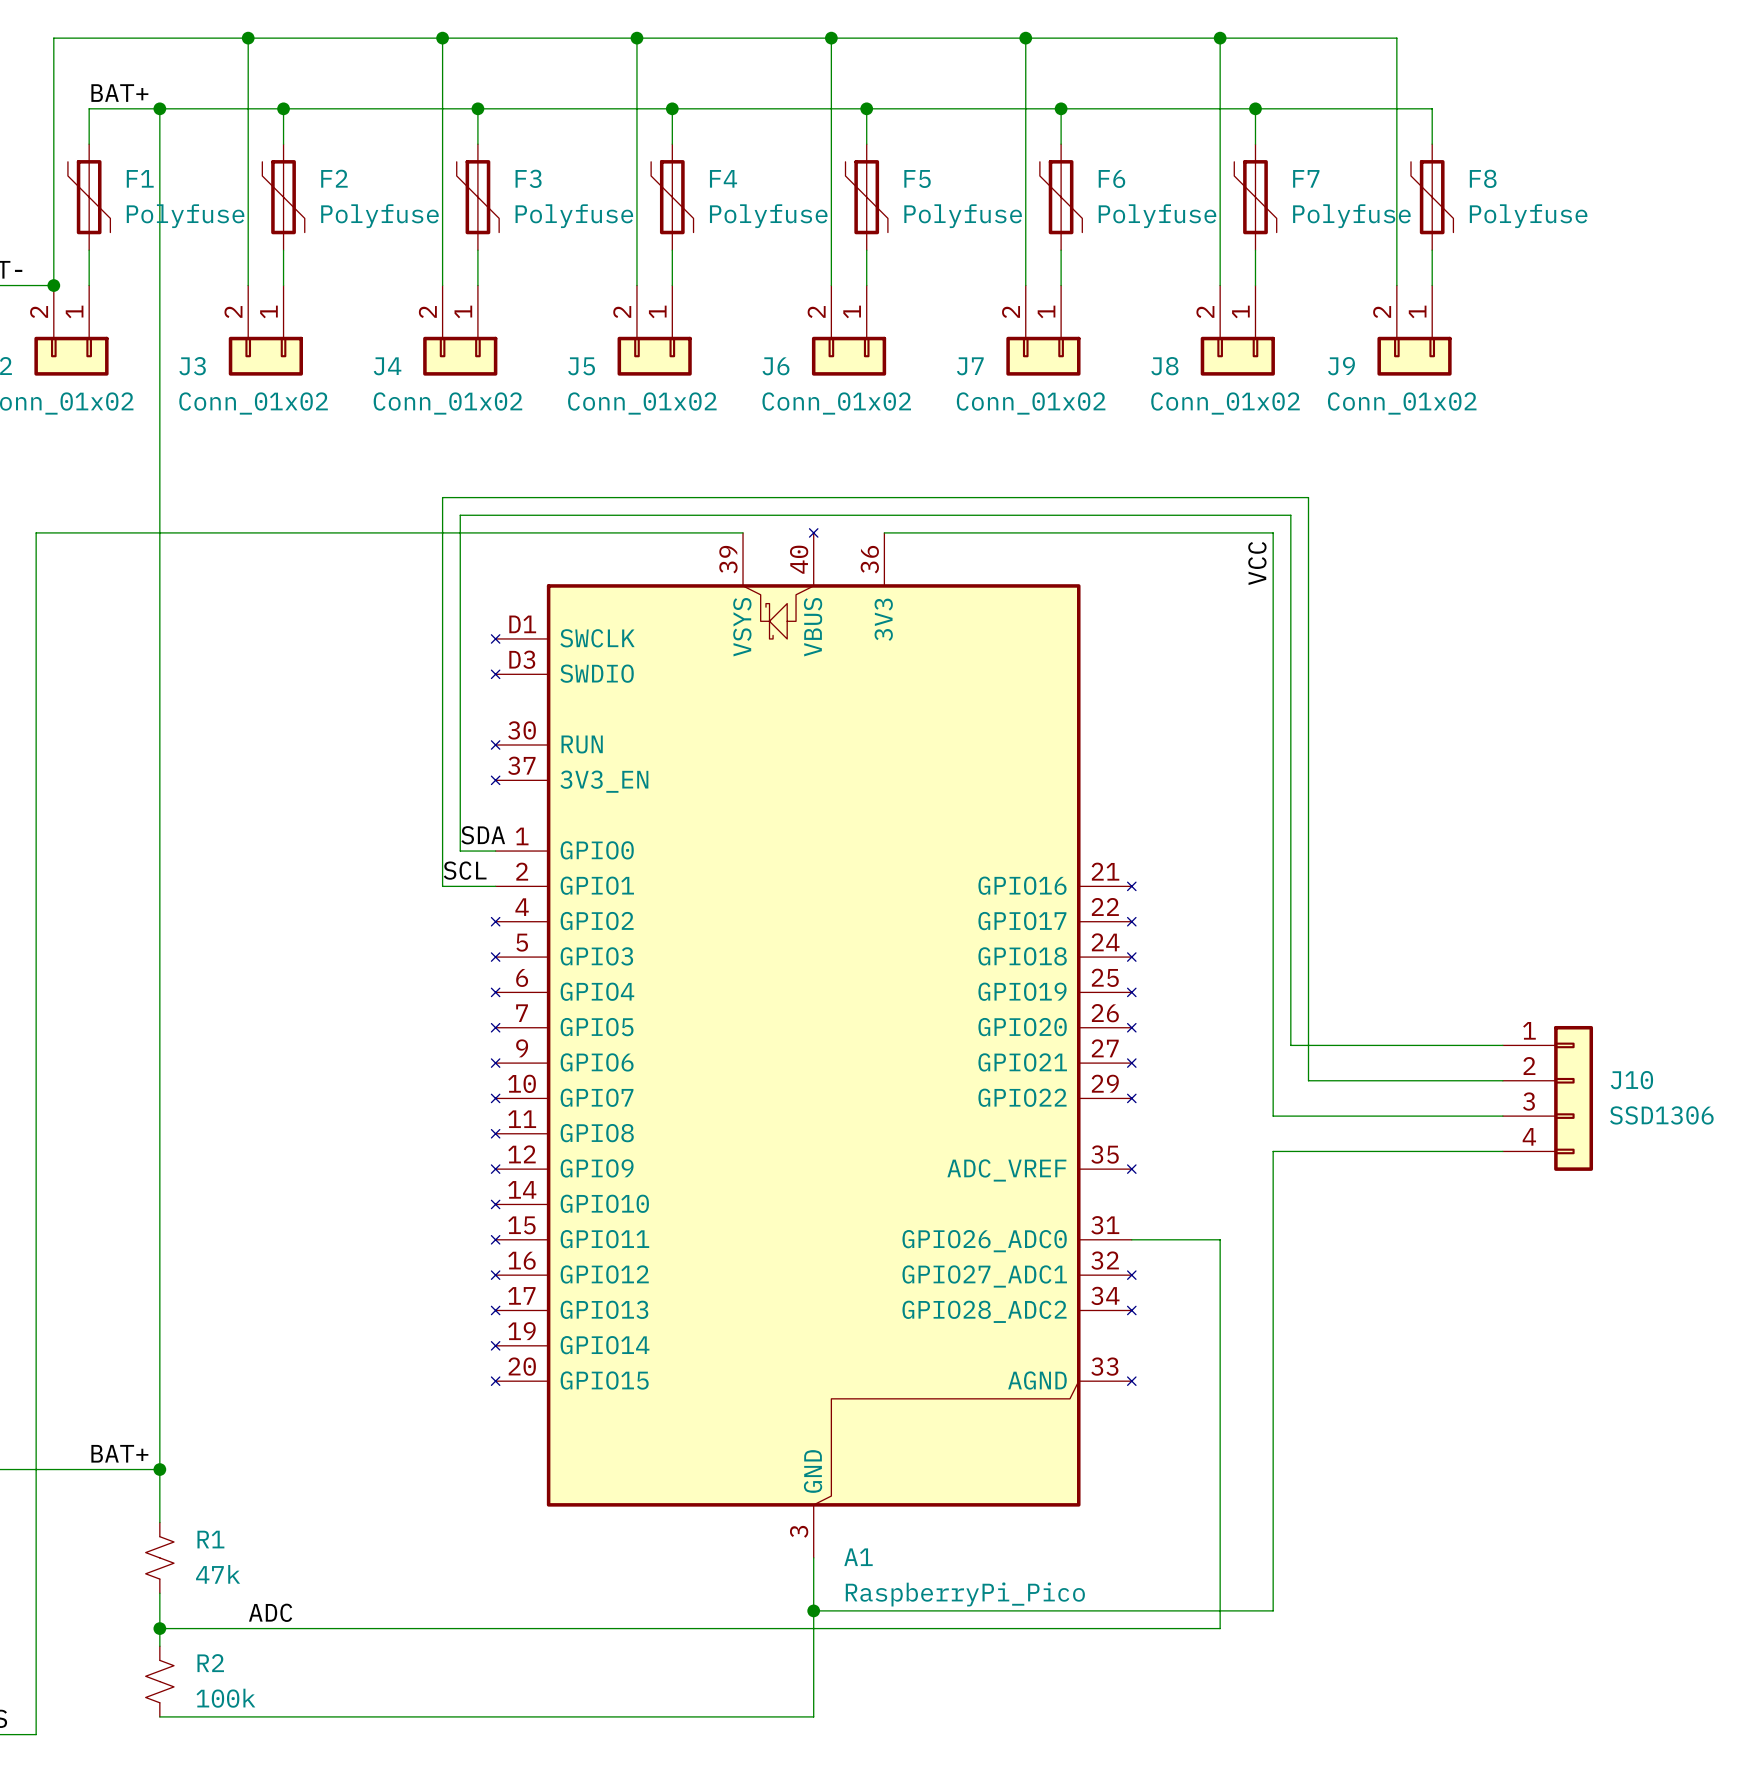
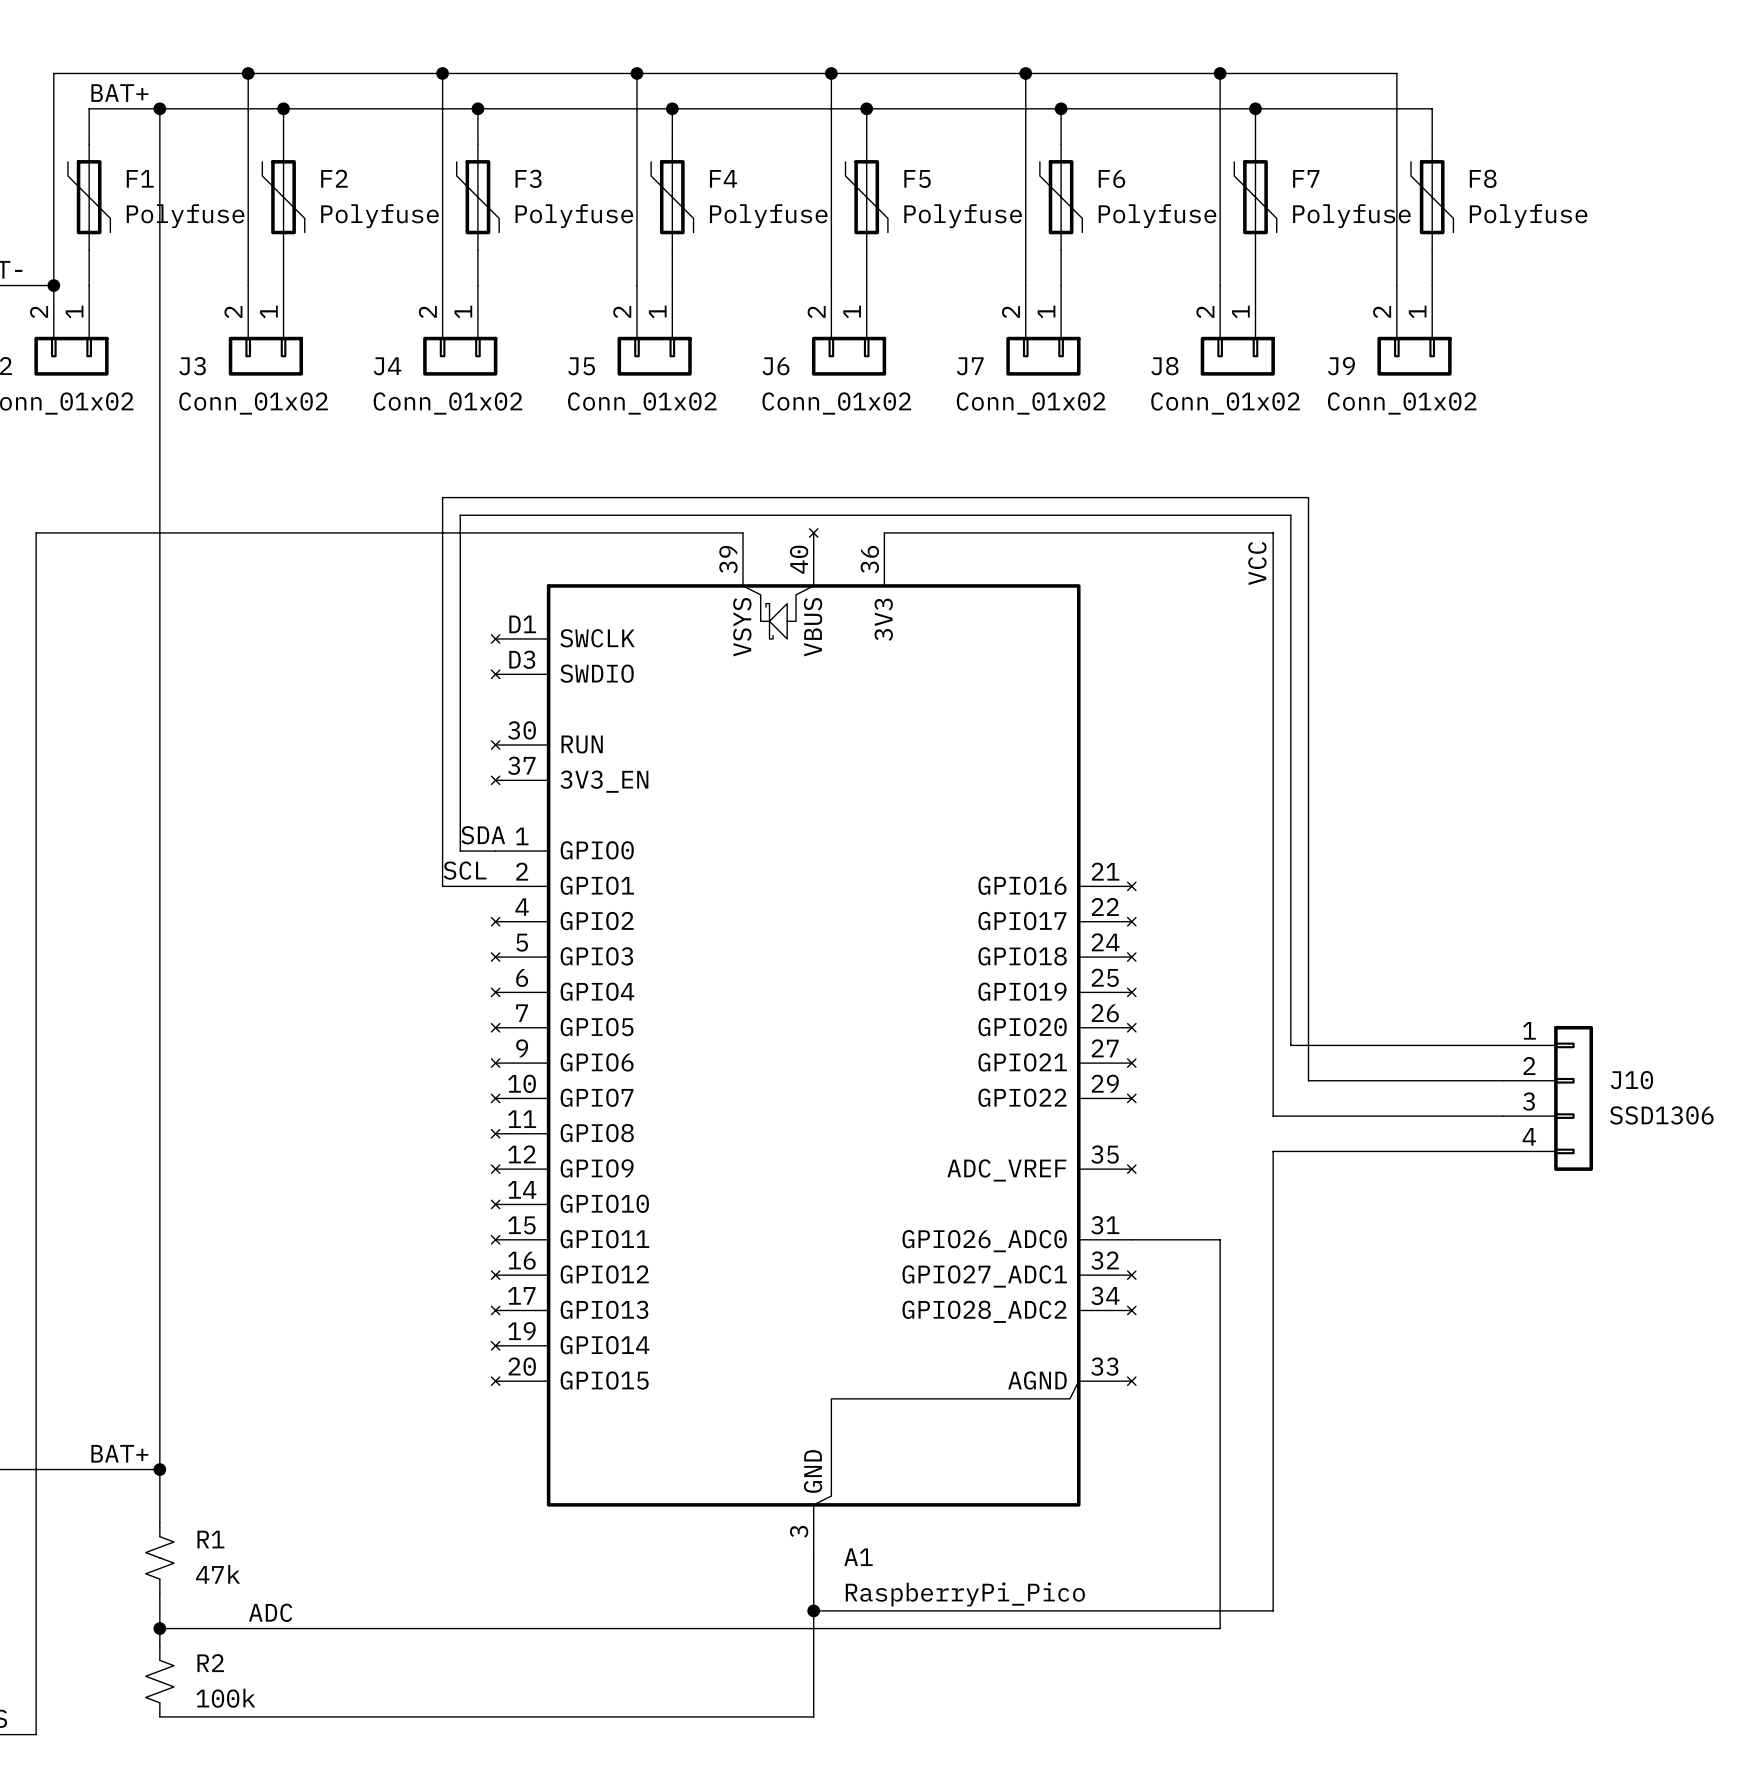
wire: (248, 38) (248, 73) -> none
junction position: (248, 38) -> (248, 73)
wire: (442, 38) (442, 73) -> none
junction position: (442, 38) -> (442, 73)
wire: (636, 38) (636, 73) -> none
junction position: (636, 38) -> (636, 73)
wire: (831, 38) (831, 73) -> none
junction position: (831, 38) -> (831, 73)
wire: (1025, 38) (1025, 73) -> none
junction position: (1025, 38) -> (1025, 73)
wire: (1220, 38) (1220, 73) -> none
junction position: (1220, 38) -> (1220, 73)
wire: (53, 73) (53, 38) (1396, 38) (1396, 73) -> (53, 73) (1396, 73)

